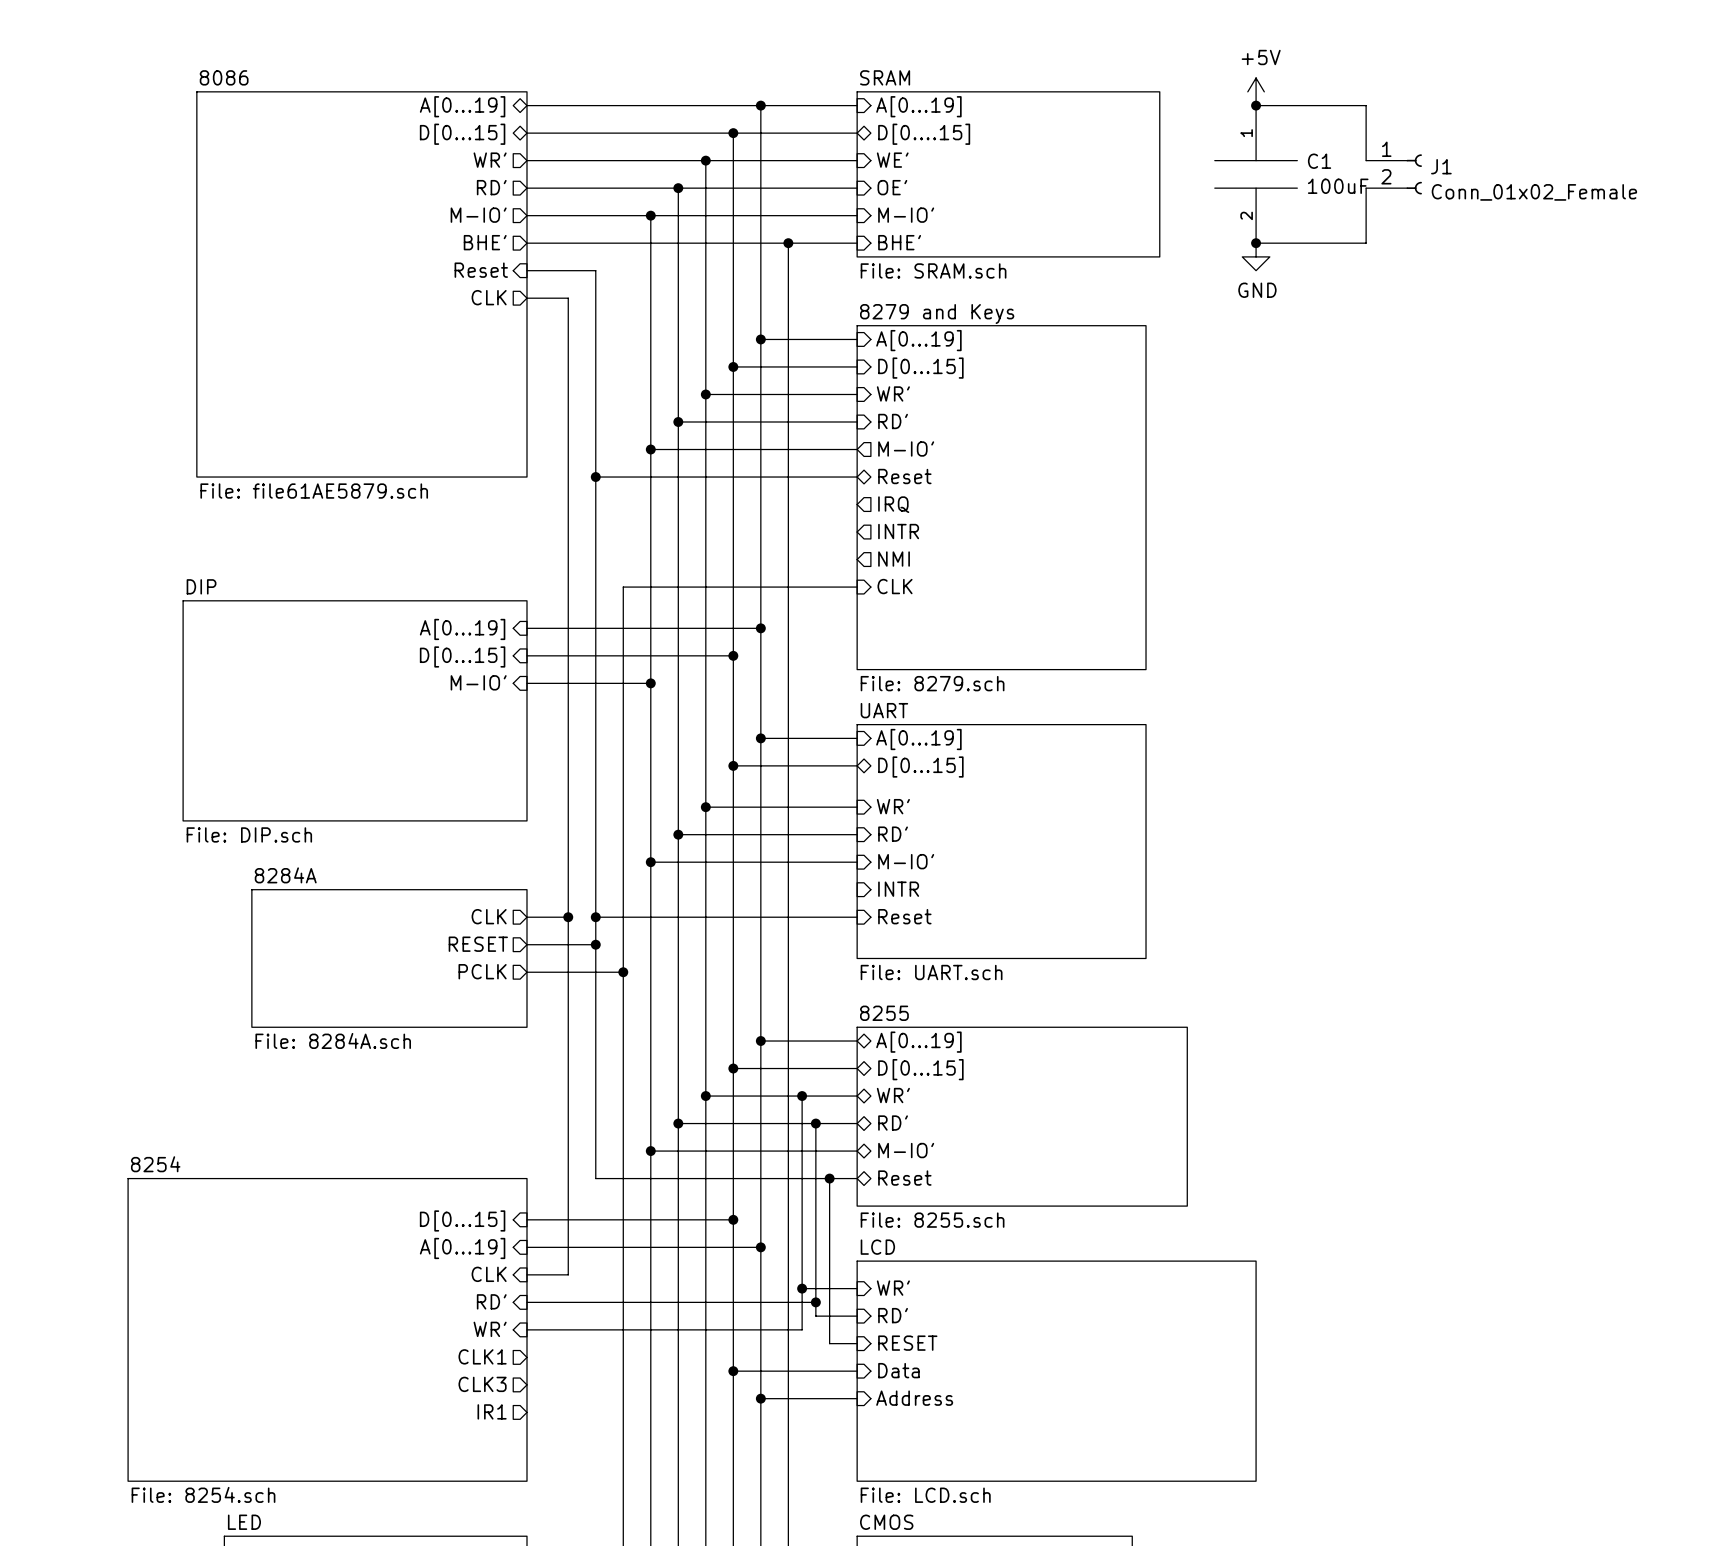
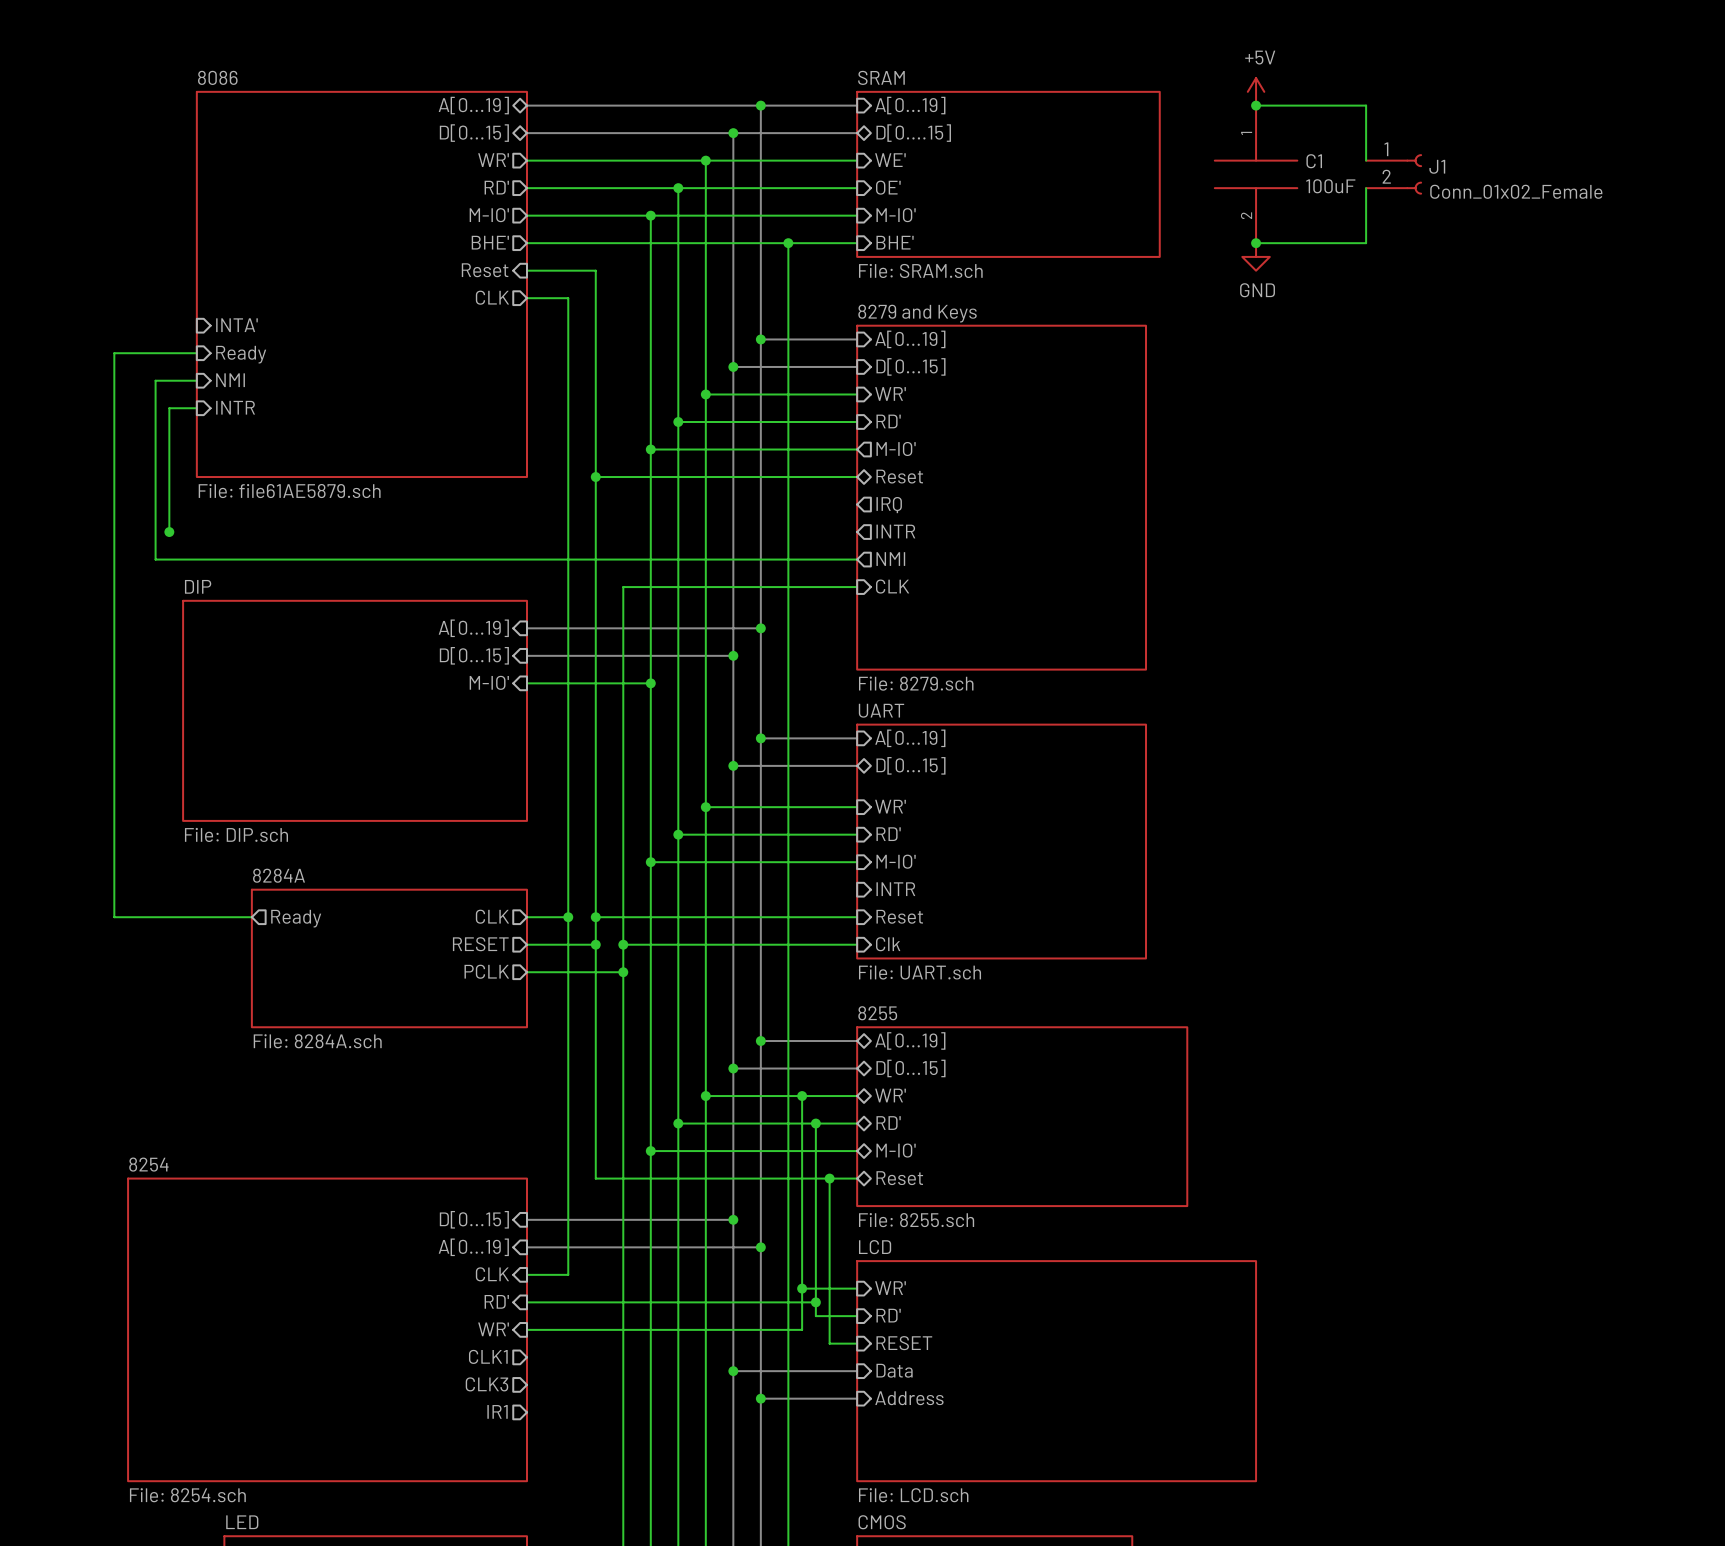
sheet pin: none -> INTA' (237, 325)
wire: none -> (196, 353) (114, 353) (114, 917) (251, 917)
sheet pin: none -> Ready (241, 354)
wire: none -> (196, 380) (155, 380) (155, 559) (857, 559)
sheet pin: none -> NMI (230, 380)
sheet pin: none -> INTR (235, 407)
wire: none -> (196, 408) (169, 408) (169, 532)
junction: none -> (169, 532)
sheet pin: none -> Ready (296, 918)
wire: none -> (623, 944) (857, 944)
junction: none -> (623, 944)
sheet pin: none -> Clk (888, 944)

